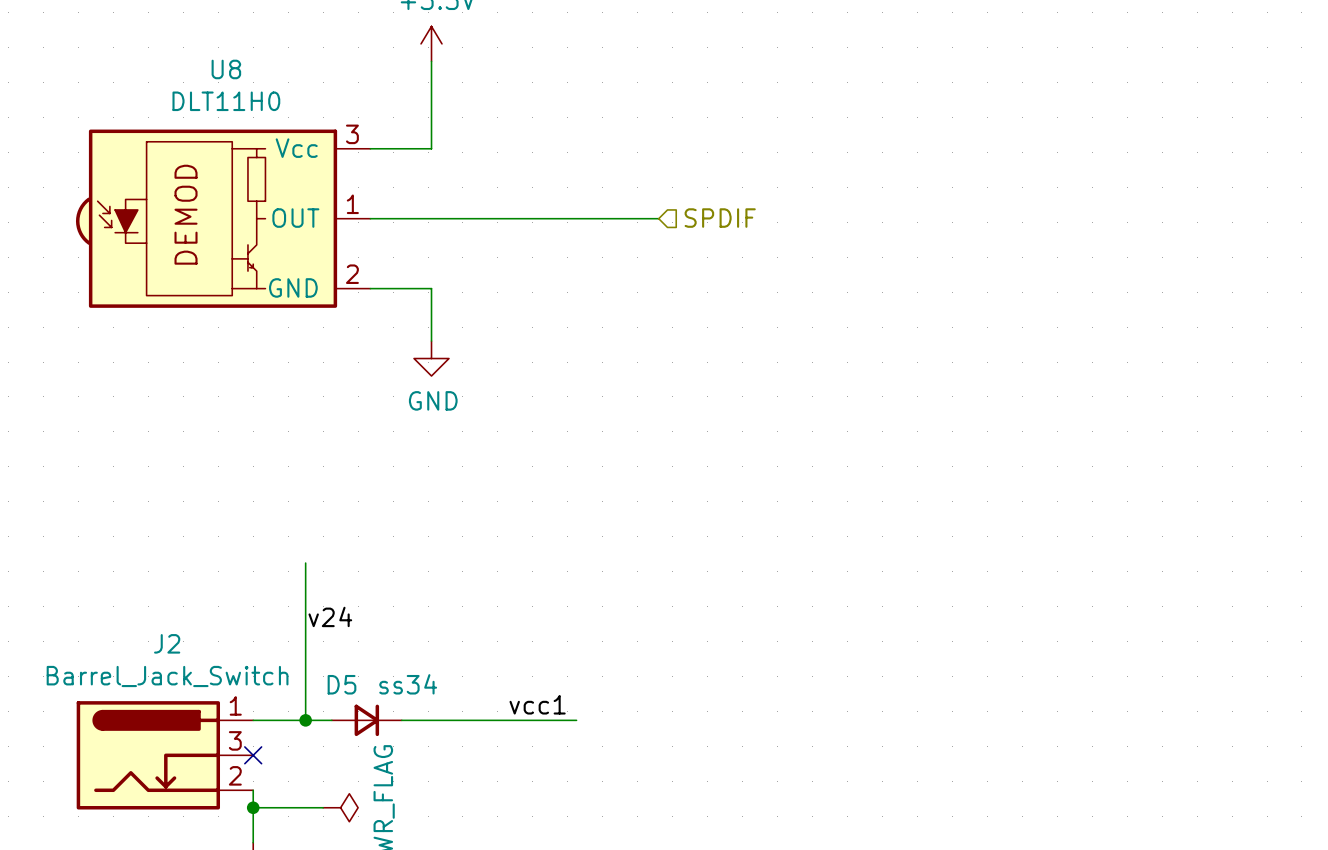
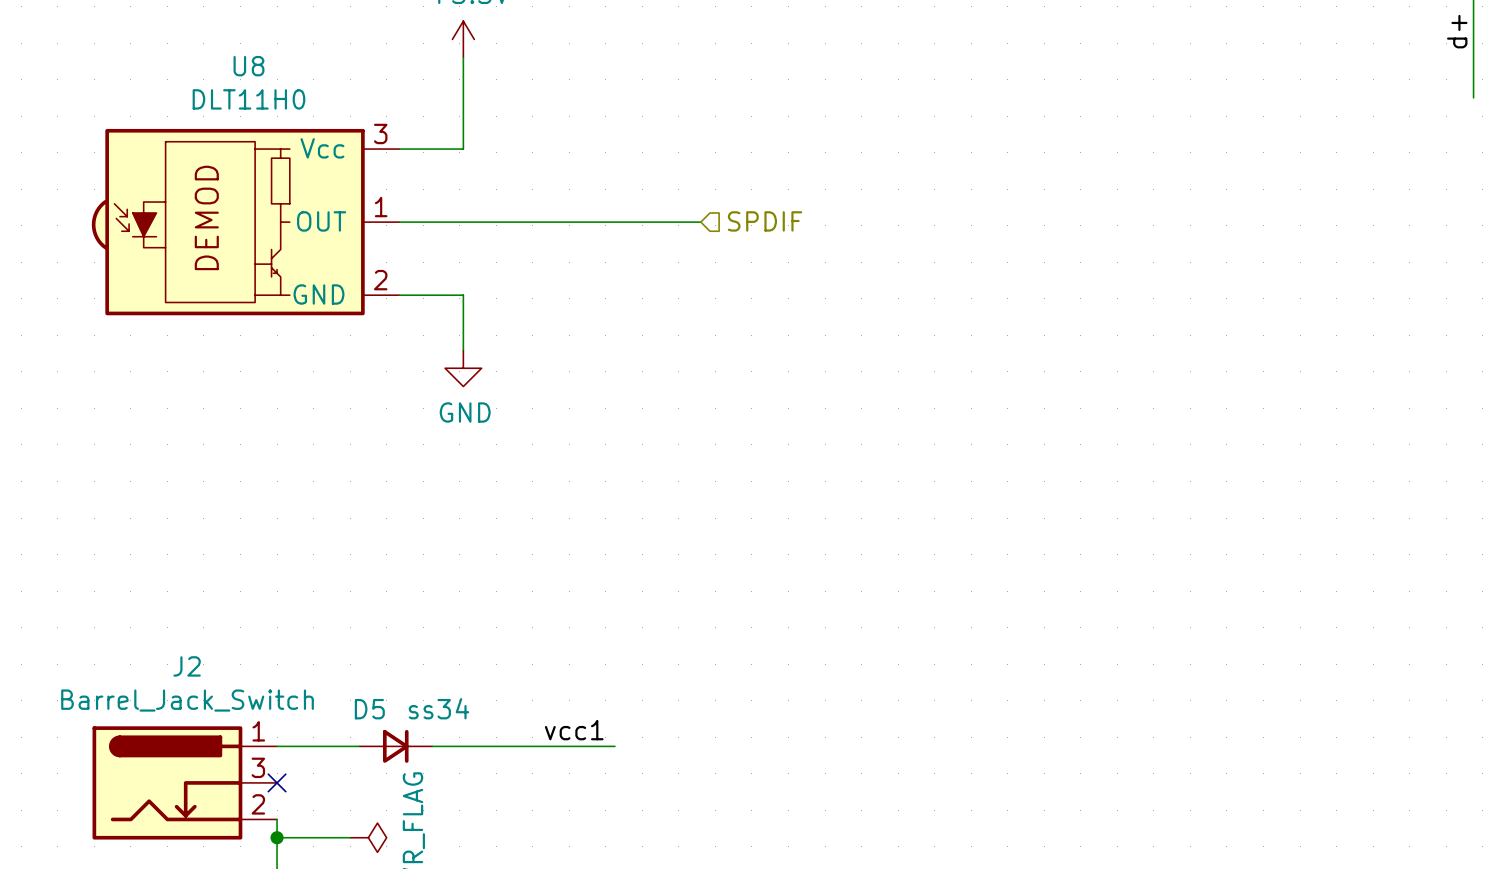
wire: (305, 563) (305, 720) -> none
label: v24 (330, 616) -> none
junction: (305, 720) -> none

